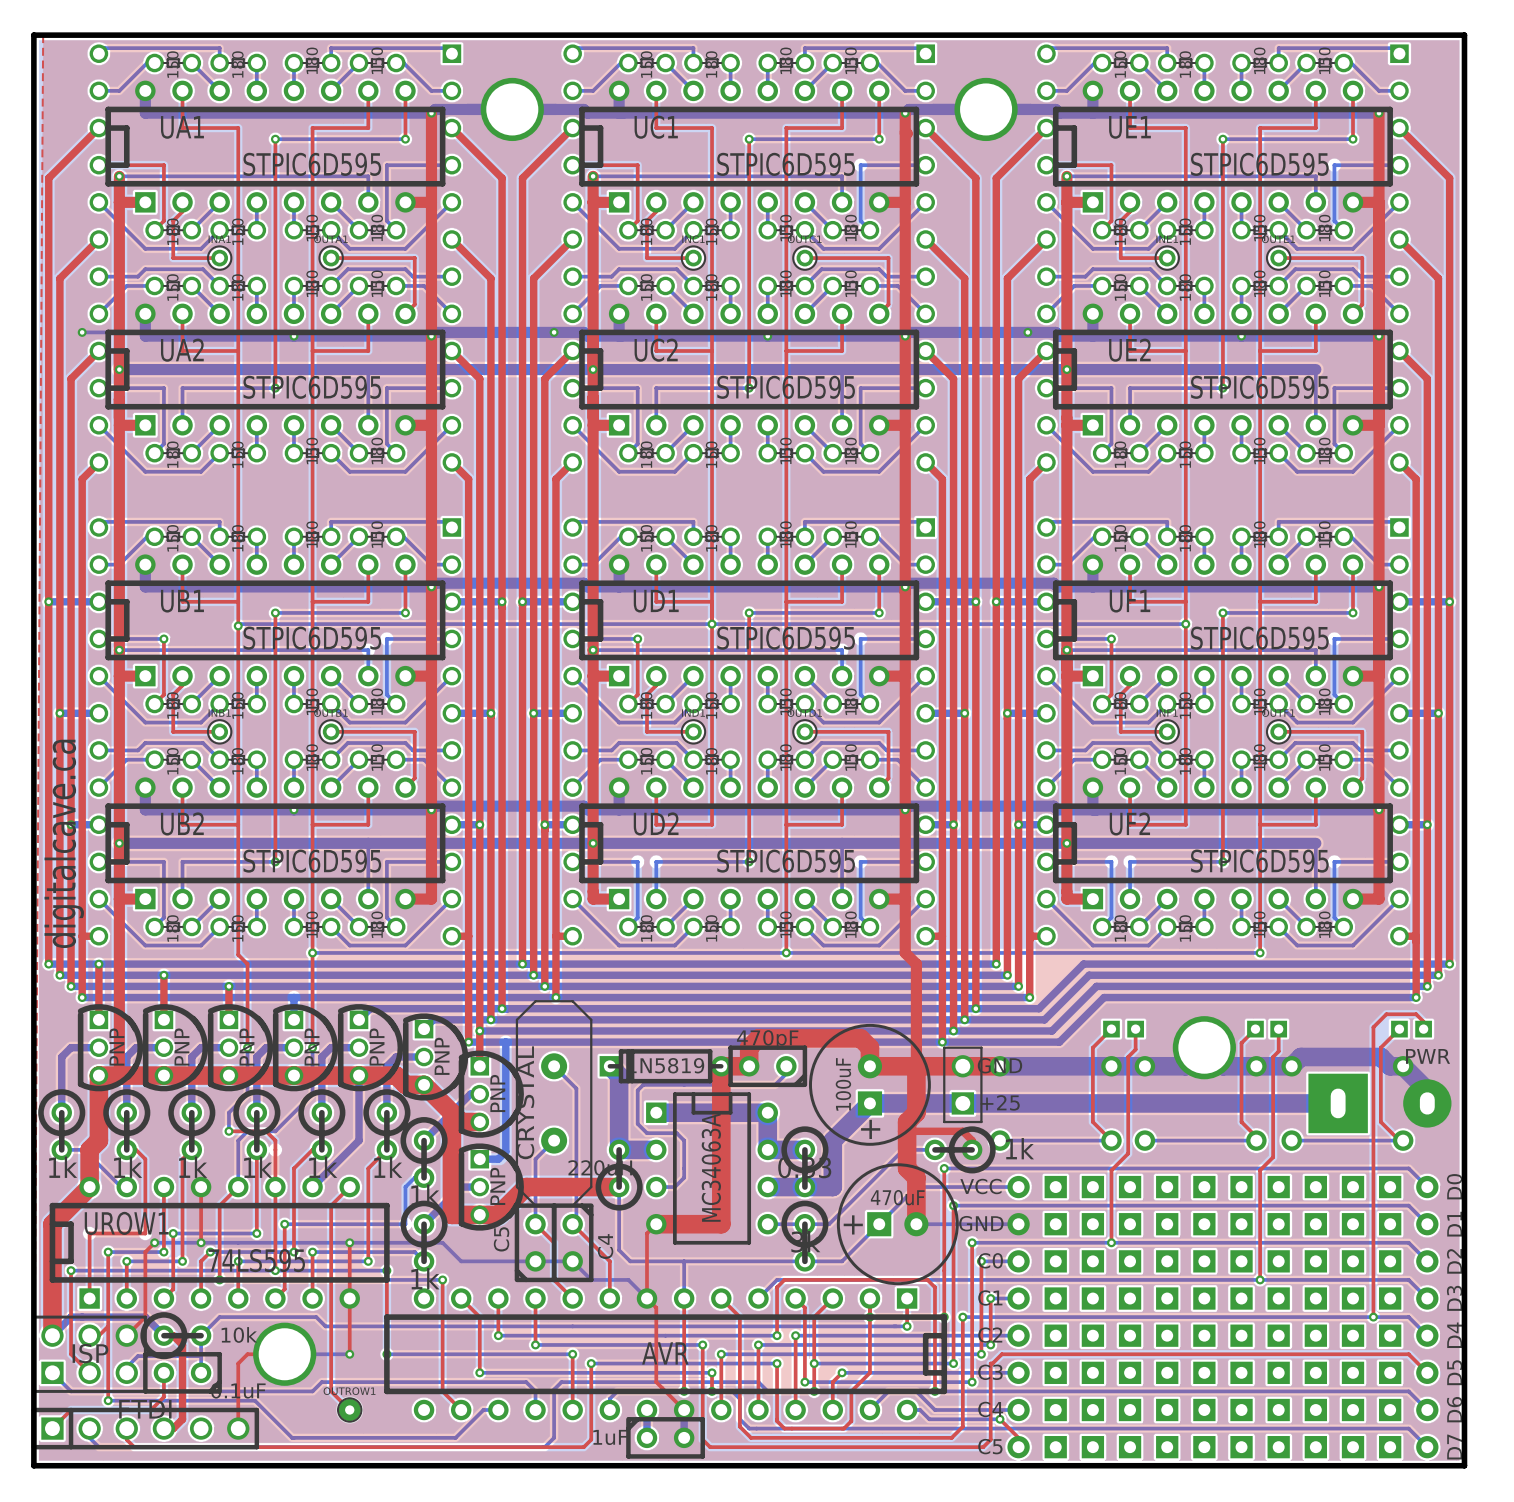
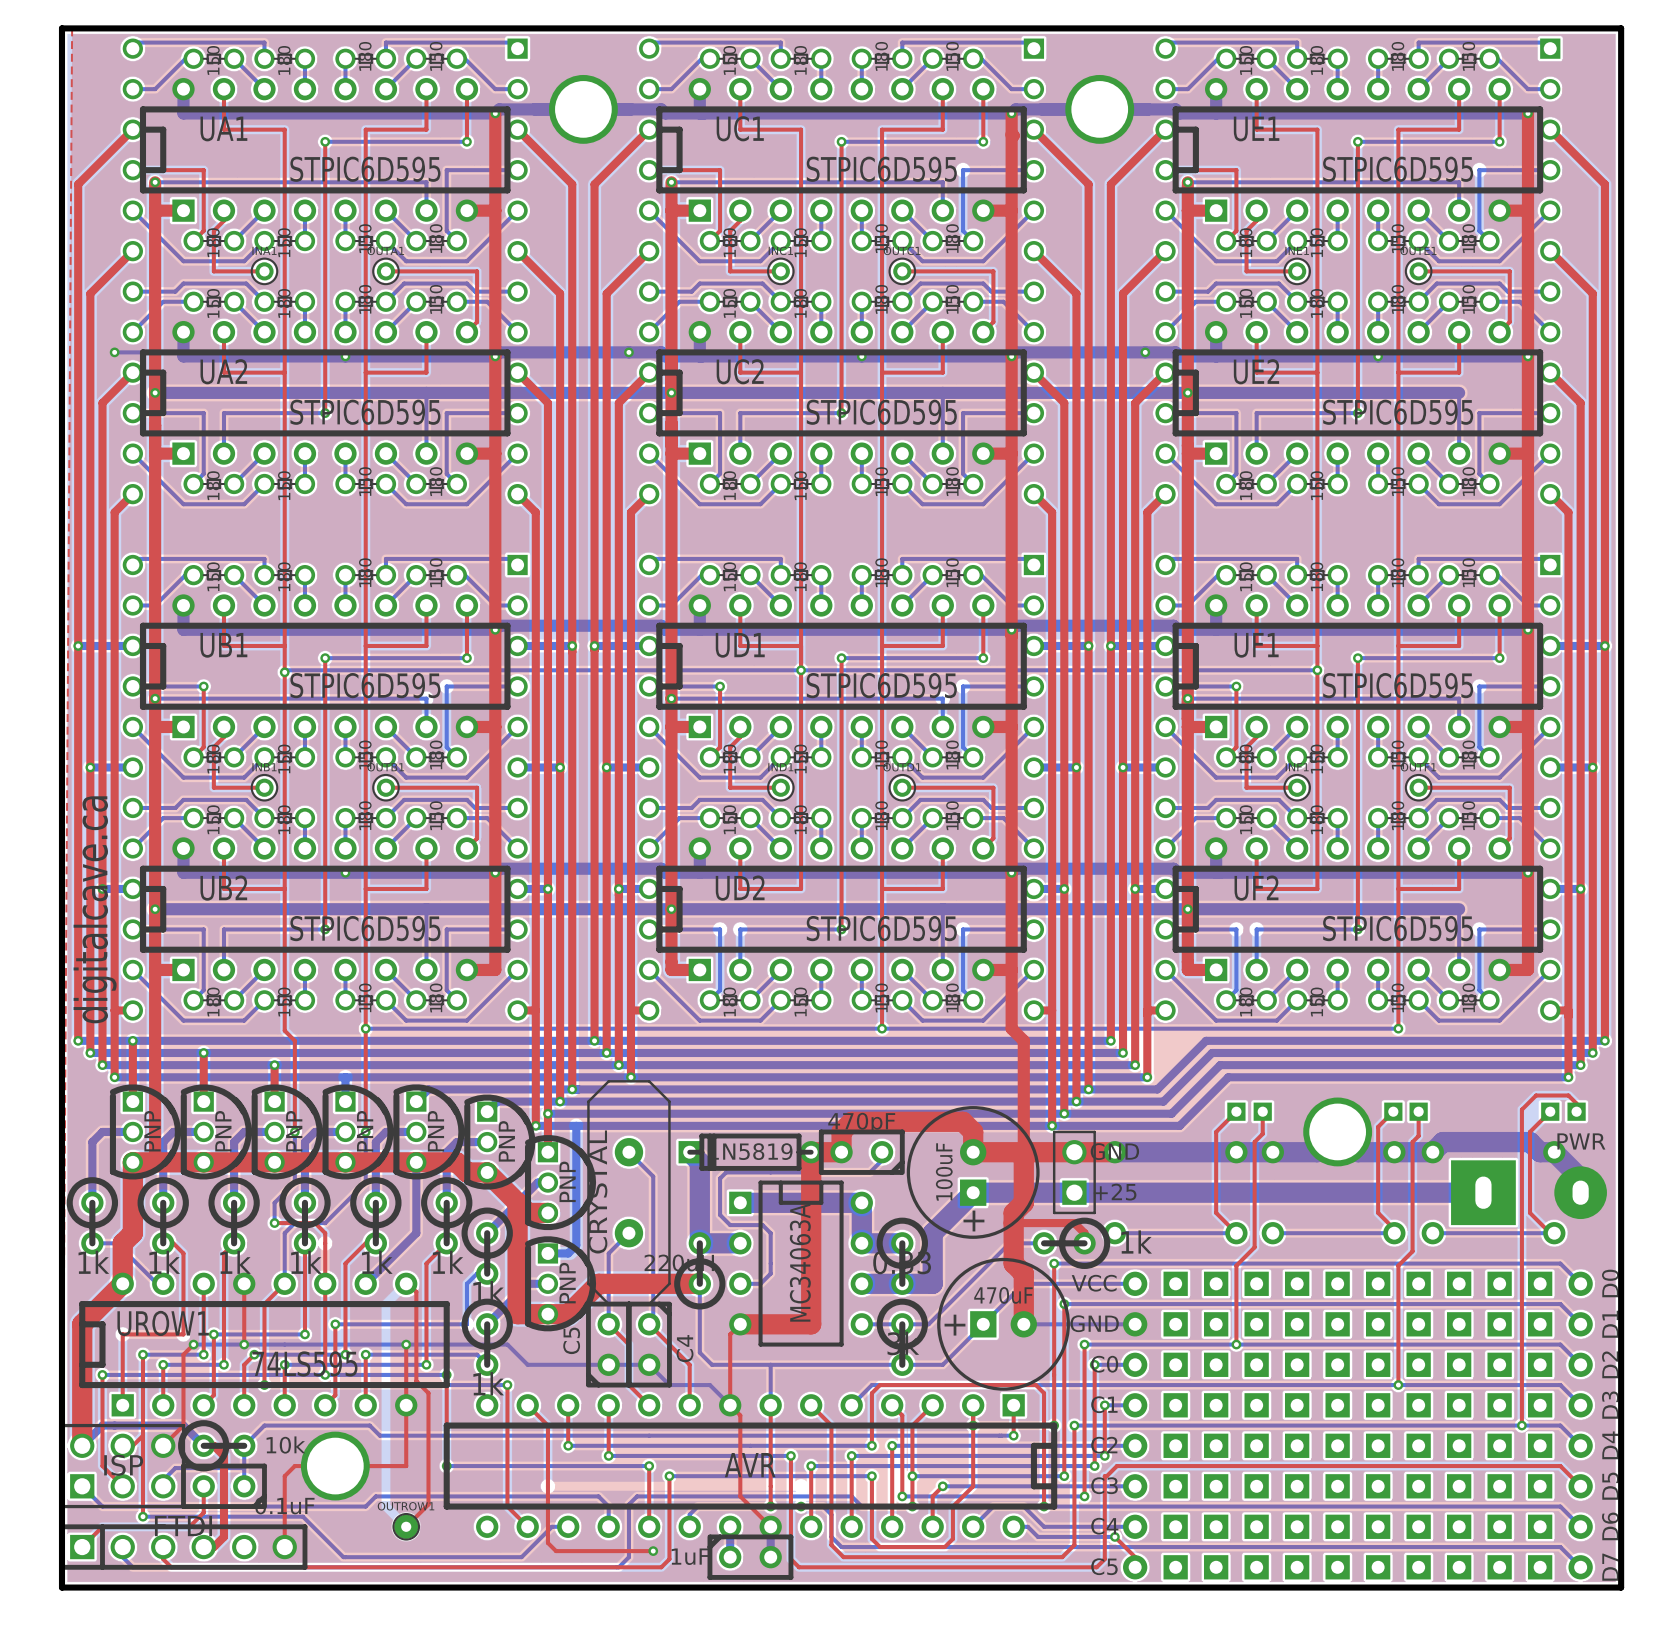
top track: (349, 1187) (331, 1205) (331, 1391) (349, 1409) -> (406, 1283) (416, 1291) (416, 1381) (428, 1393) (428, 1504) (406, 1526)
top track: none -> (335, 1466) (406, 1466)
via: (349, 1354) -> none
bottom track: (479, 1372) (712, 1372) -> none
top track: none -> (547, 1486) (547, 1543) (556, 1551) (653, 1551)
via: (479, 1372) -> none
top track: (712, 1372) (712, 1391) -> none
via: (712, 1372) -> none
via: none -> (653, 1551)

